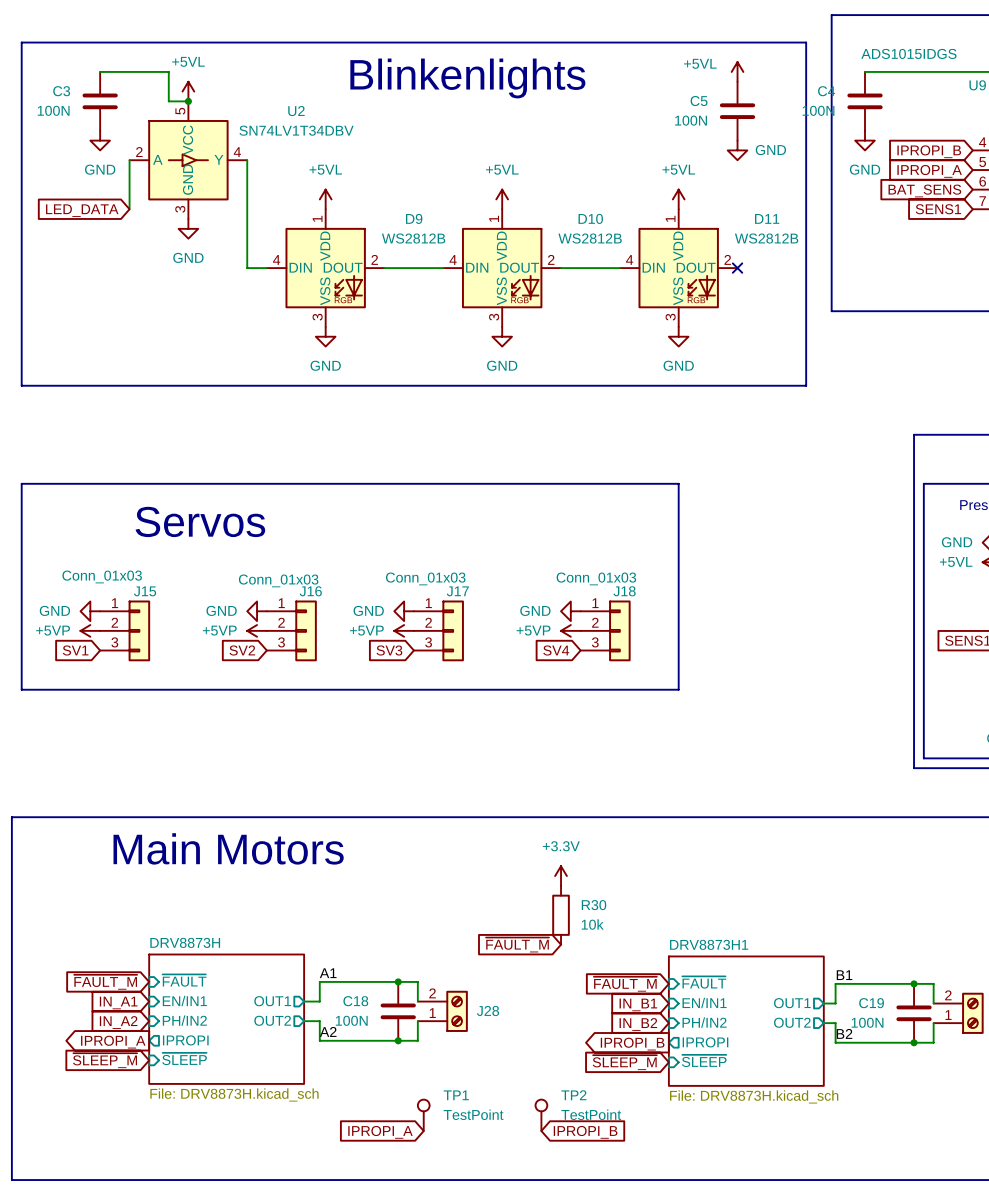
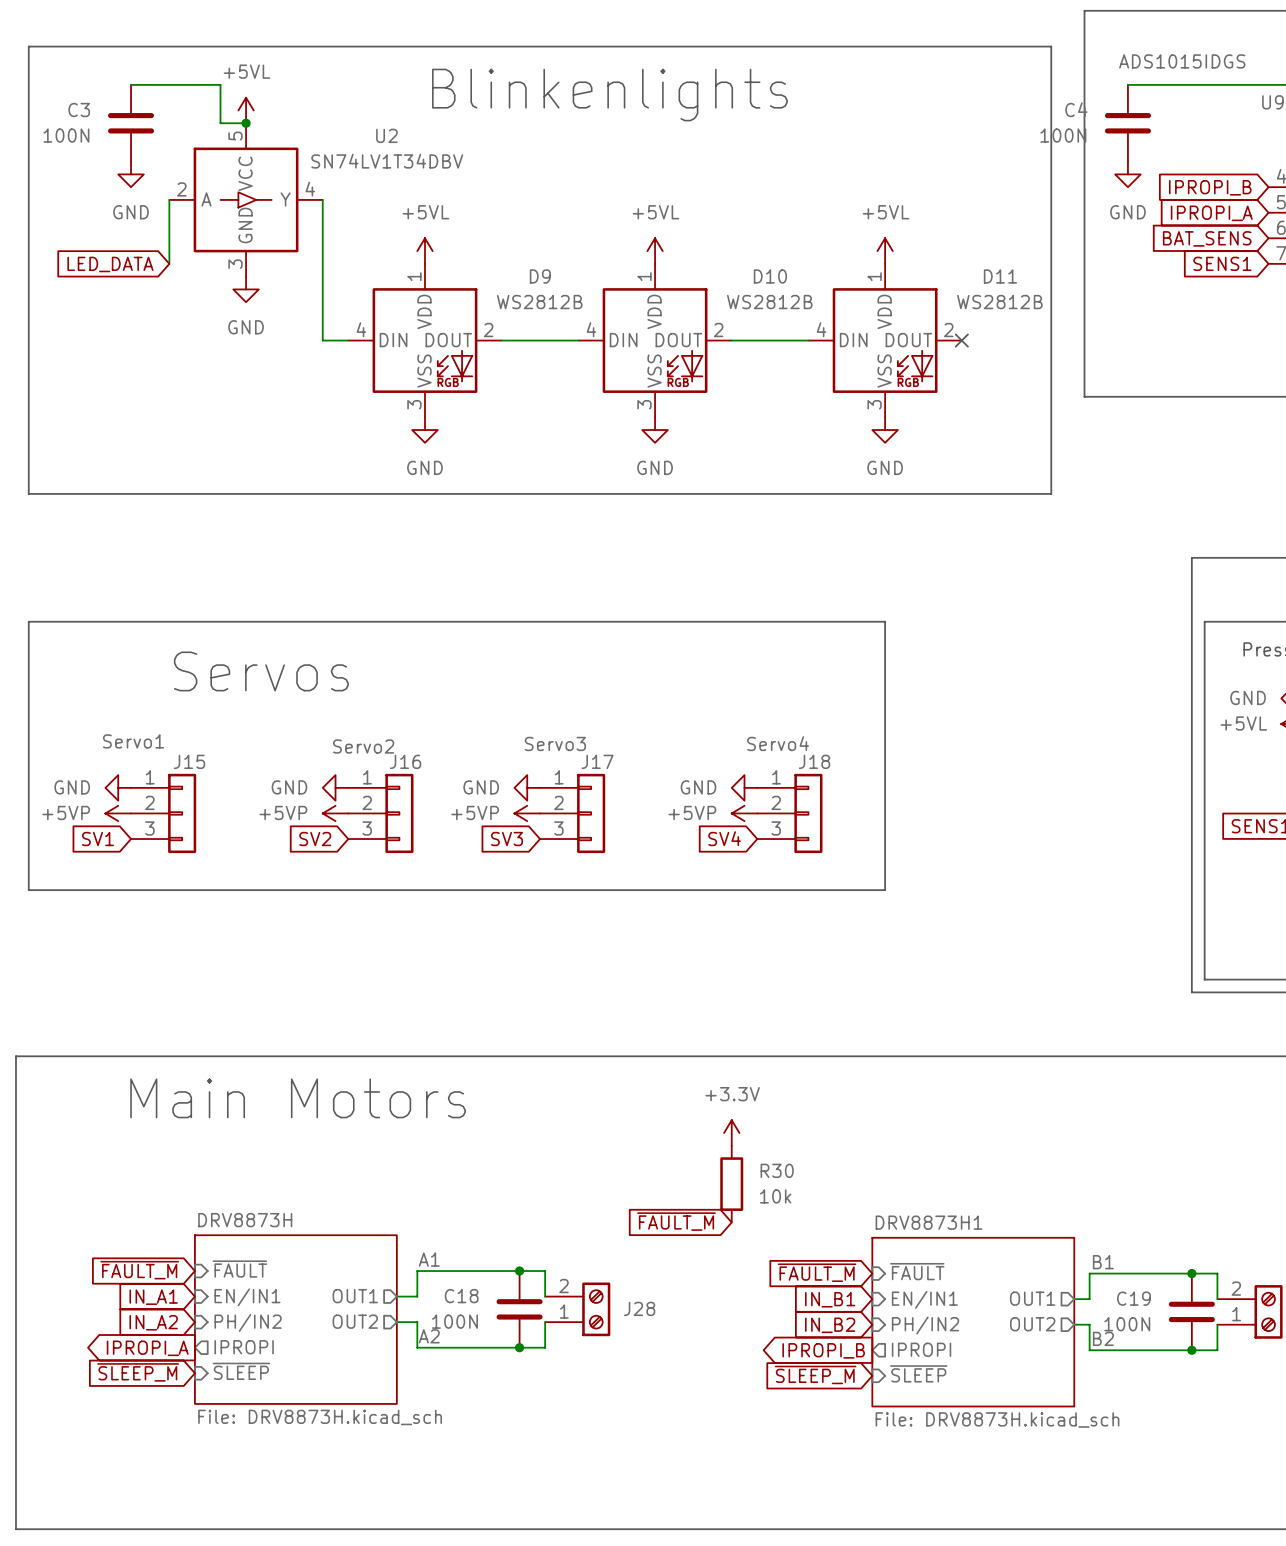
power symbol: +5VL (737, 71) -> none
C5: 100N (737, 111) -> none
power symbol: GND (737, 150) -> none
J15 value: Conn_01x03 (102, 576) -> Servo1 (133, 741)
J17 value: Conn_01x03 (425, 578) -> Servo3 (555, 743)
J18 value: Conn_01x03 (596, 578) -> Servo4 (778, 743)
J16 value: Conn_01x03 (278, 580) -> Servo2 (363, 746)
TP1: TestPoint (423, 1115) -> none
TP2: TestPoint (541, 1115) -> none
global label: IPROPI_A (380, 1132) -> none
global label: IPROPI_B (585, 1132) -> none

